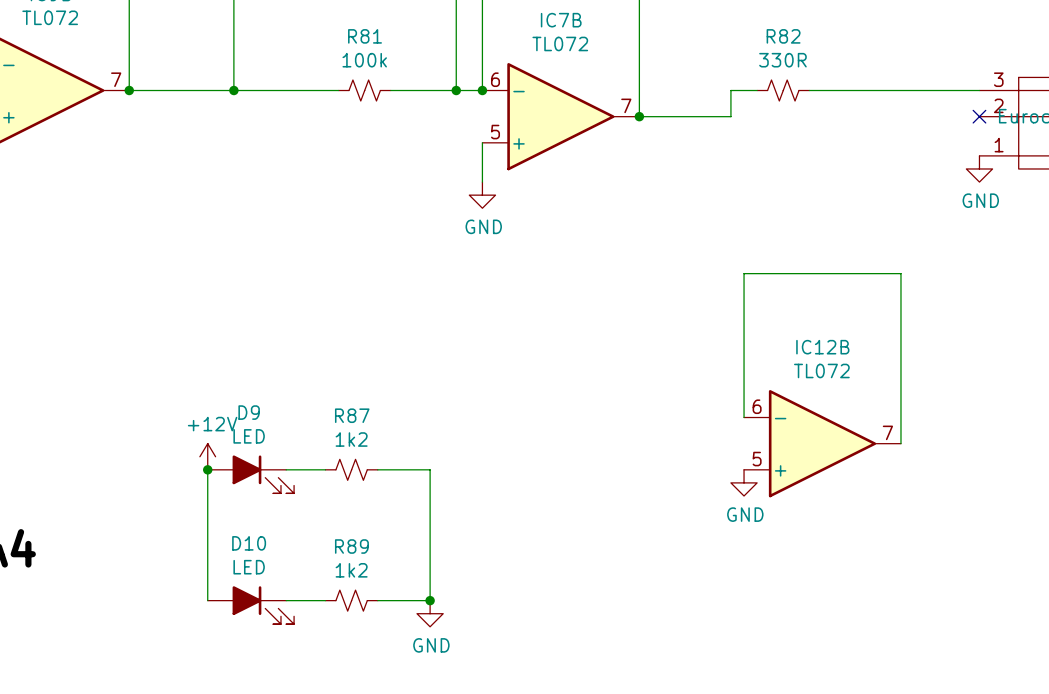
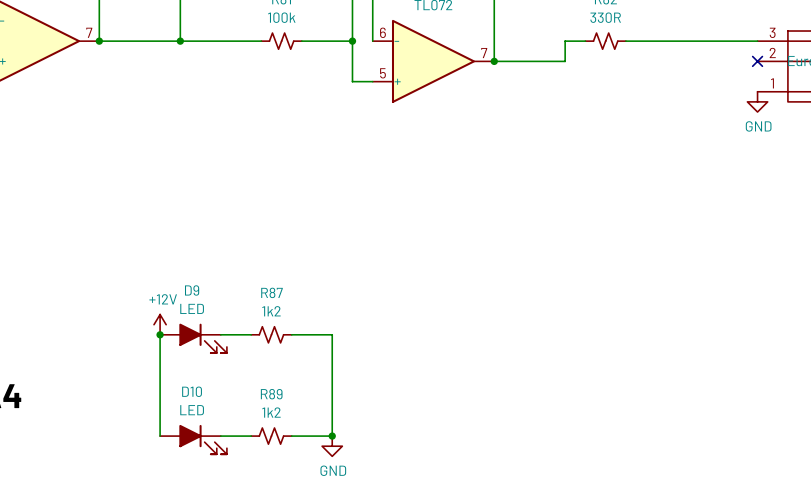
wire: (456, 90) (482, 90) -> (352, 41) (352, 81) (372, 81)
junction: (482, 90) -> none
wire: (482, 142) (482, 182) -> none
power symbol: GND (482, 195) -> none
wire: (744, 417) (744, 273) (900, 273) (900, 443) -> none
IC12B: TL072 (822, 443) -> none
power symbol: GND (744, 482) -> none

